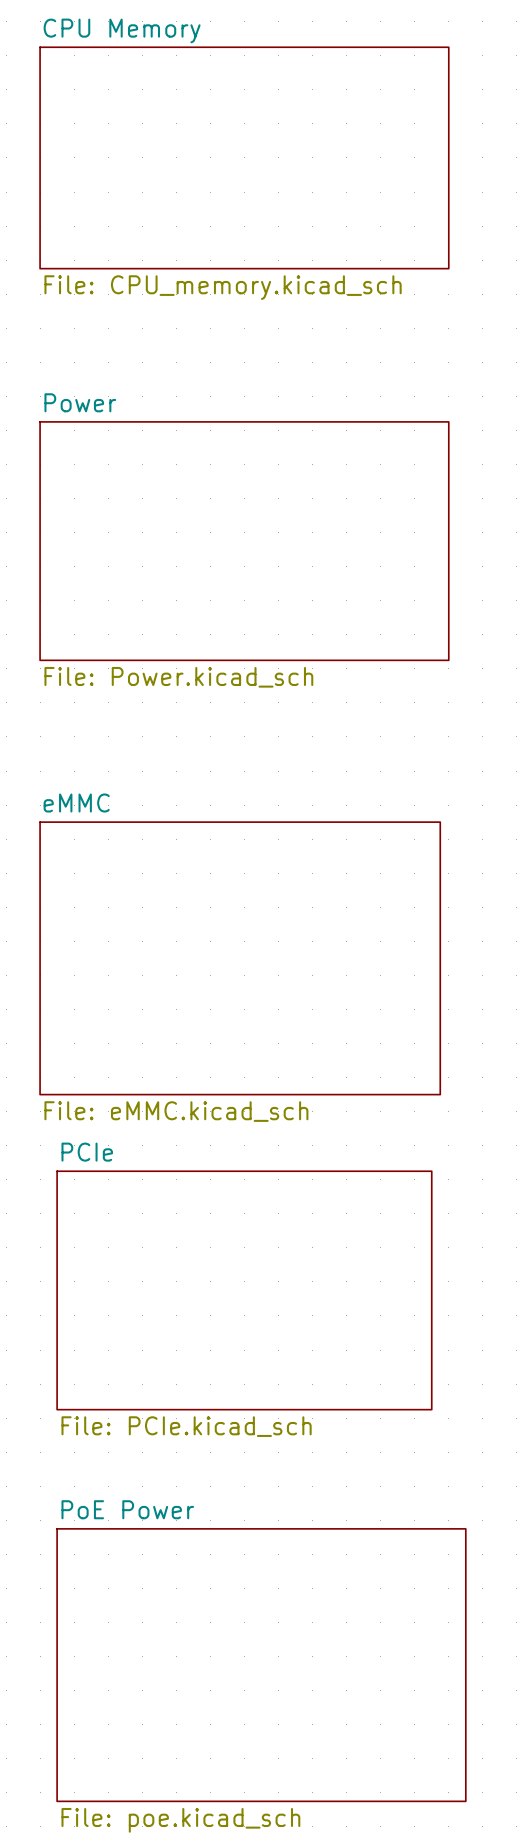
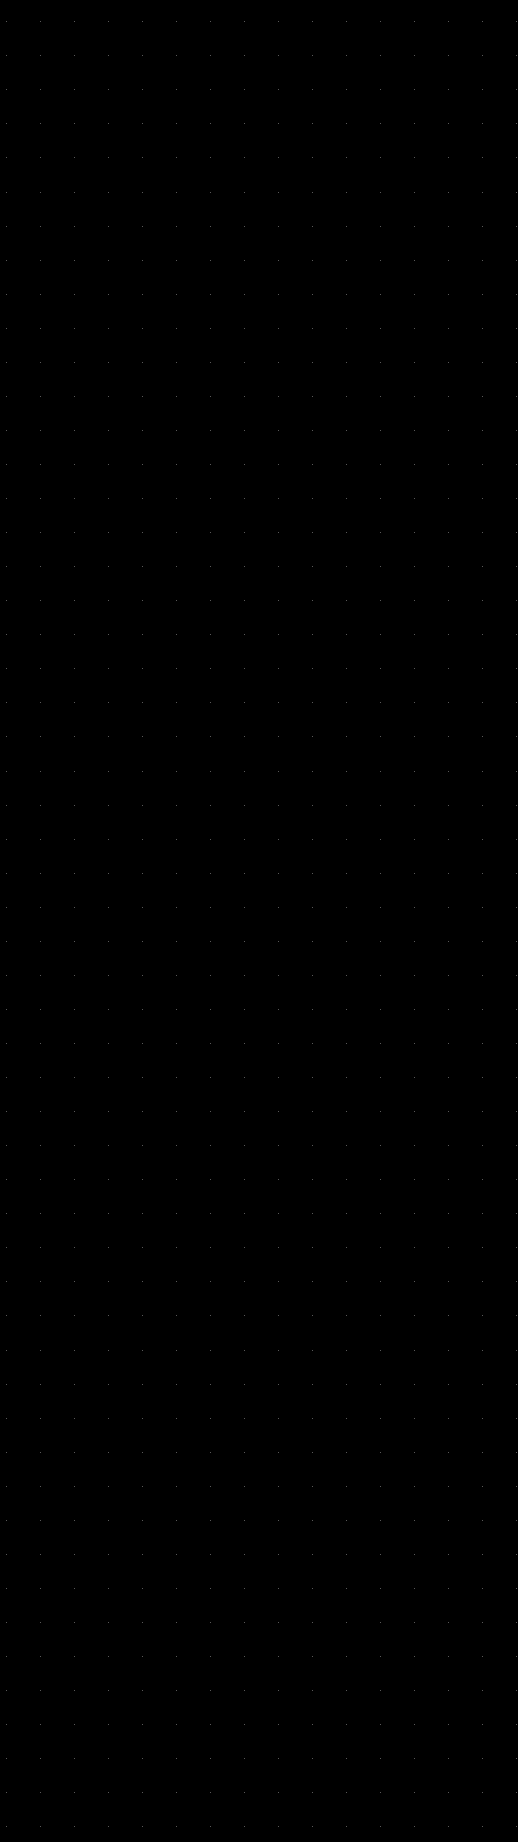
sheet CPU Memory: File: CPU_memory.kicad_sch (244, 157) -> none
sheet Power: File: Power.kicad_sch (244, 541) -> none
sheet eMMC: File: eMMC.kicad_sch (240, 958) -> none
sheet PCIe: File: PCIe.kicad_sch (244, 1290) -> none
sheet PoE Power: File: poe.kicad_sch (261, 1665) -> none

